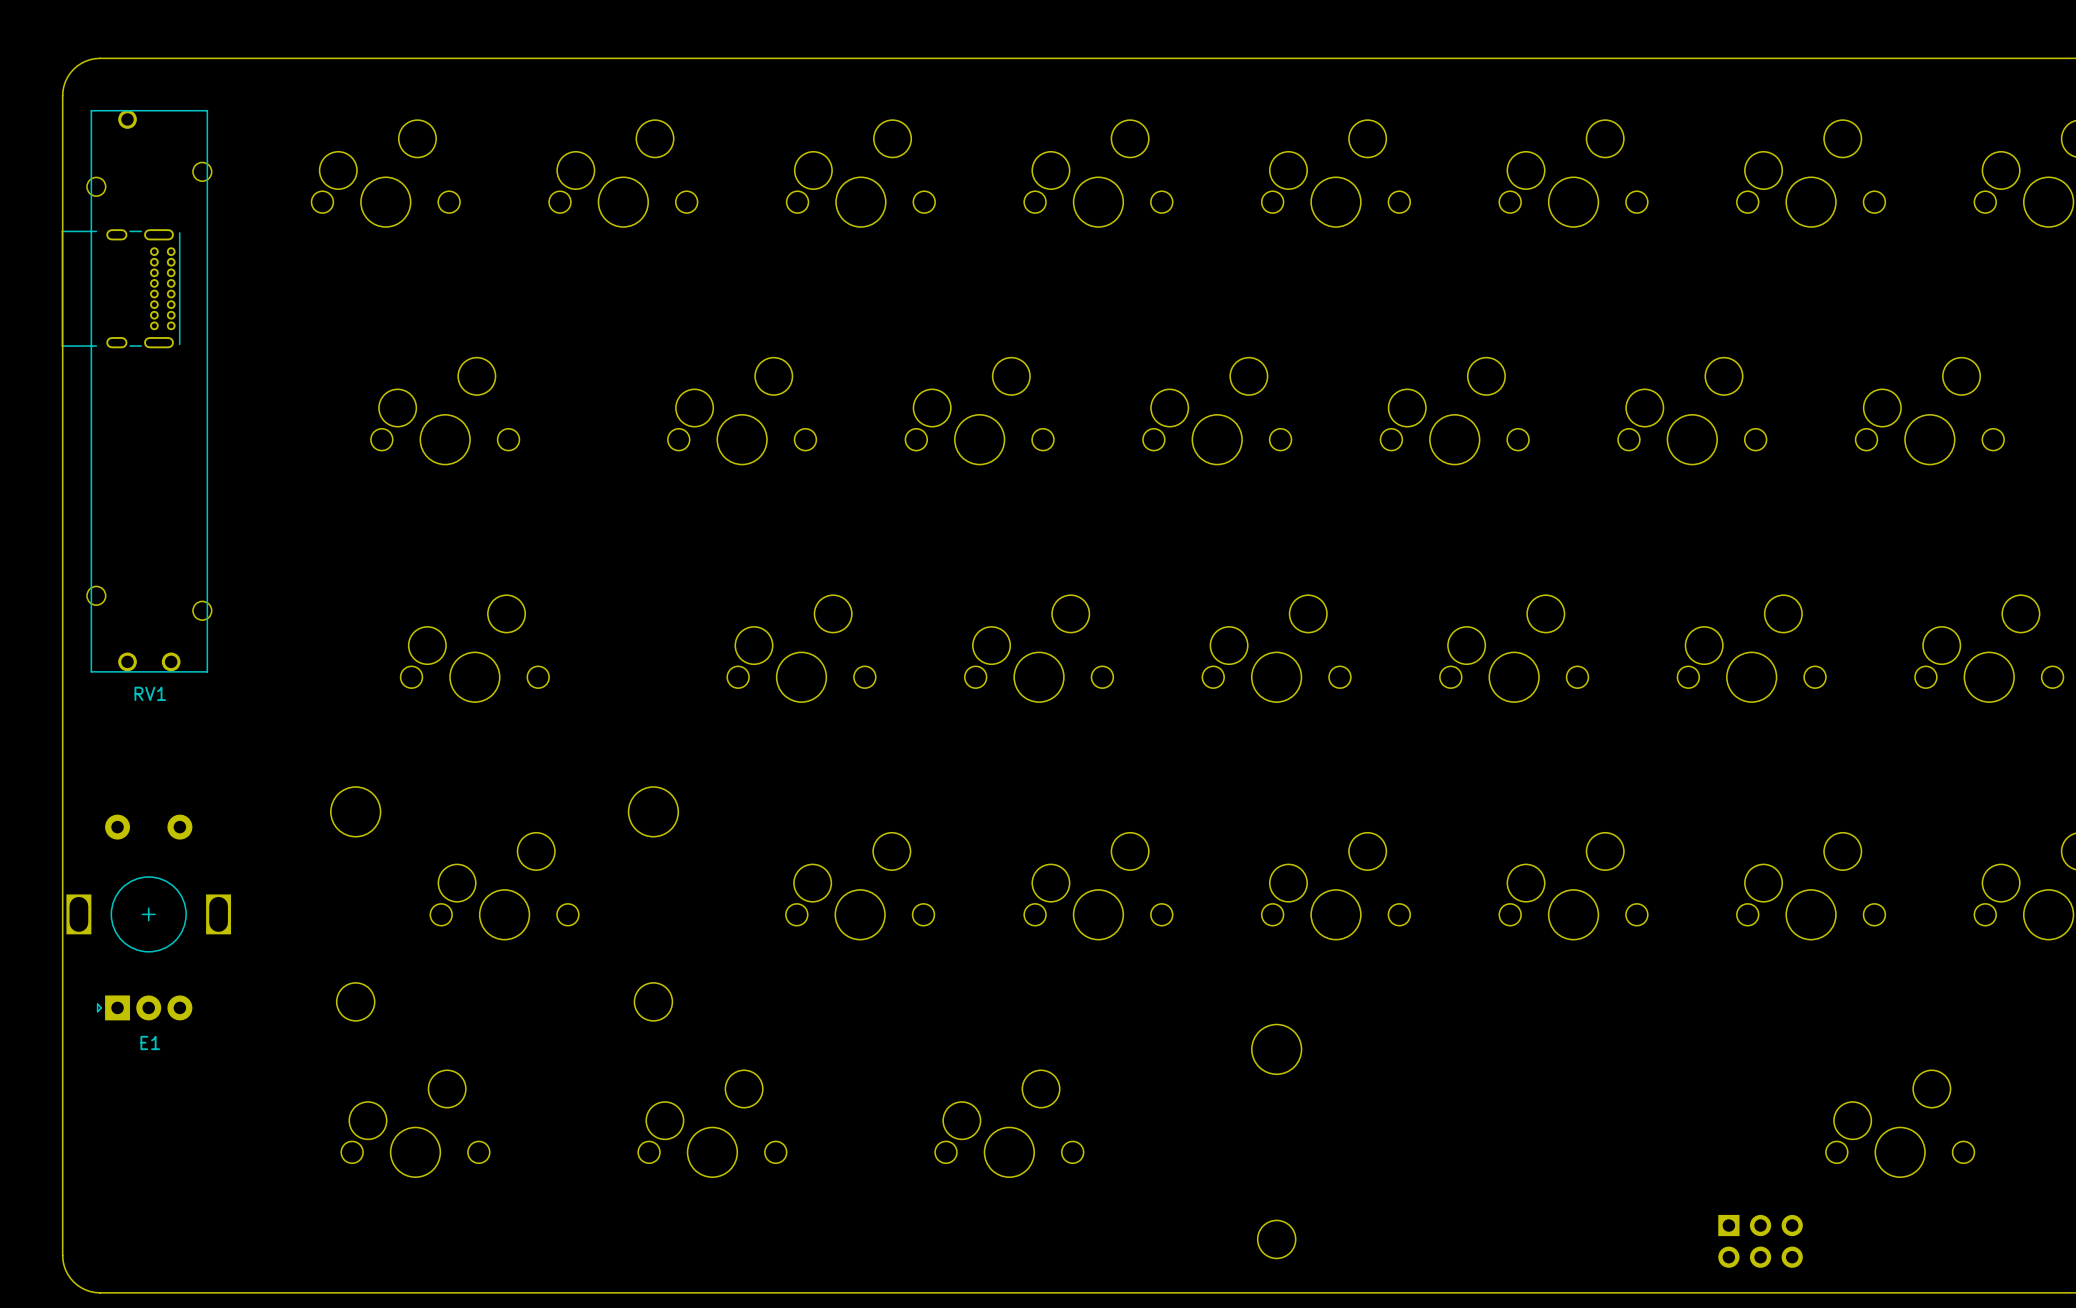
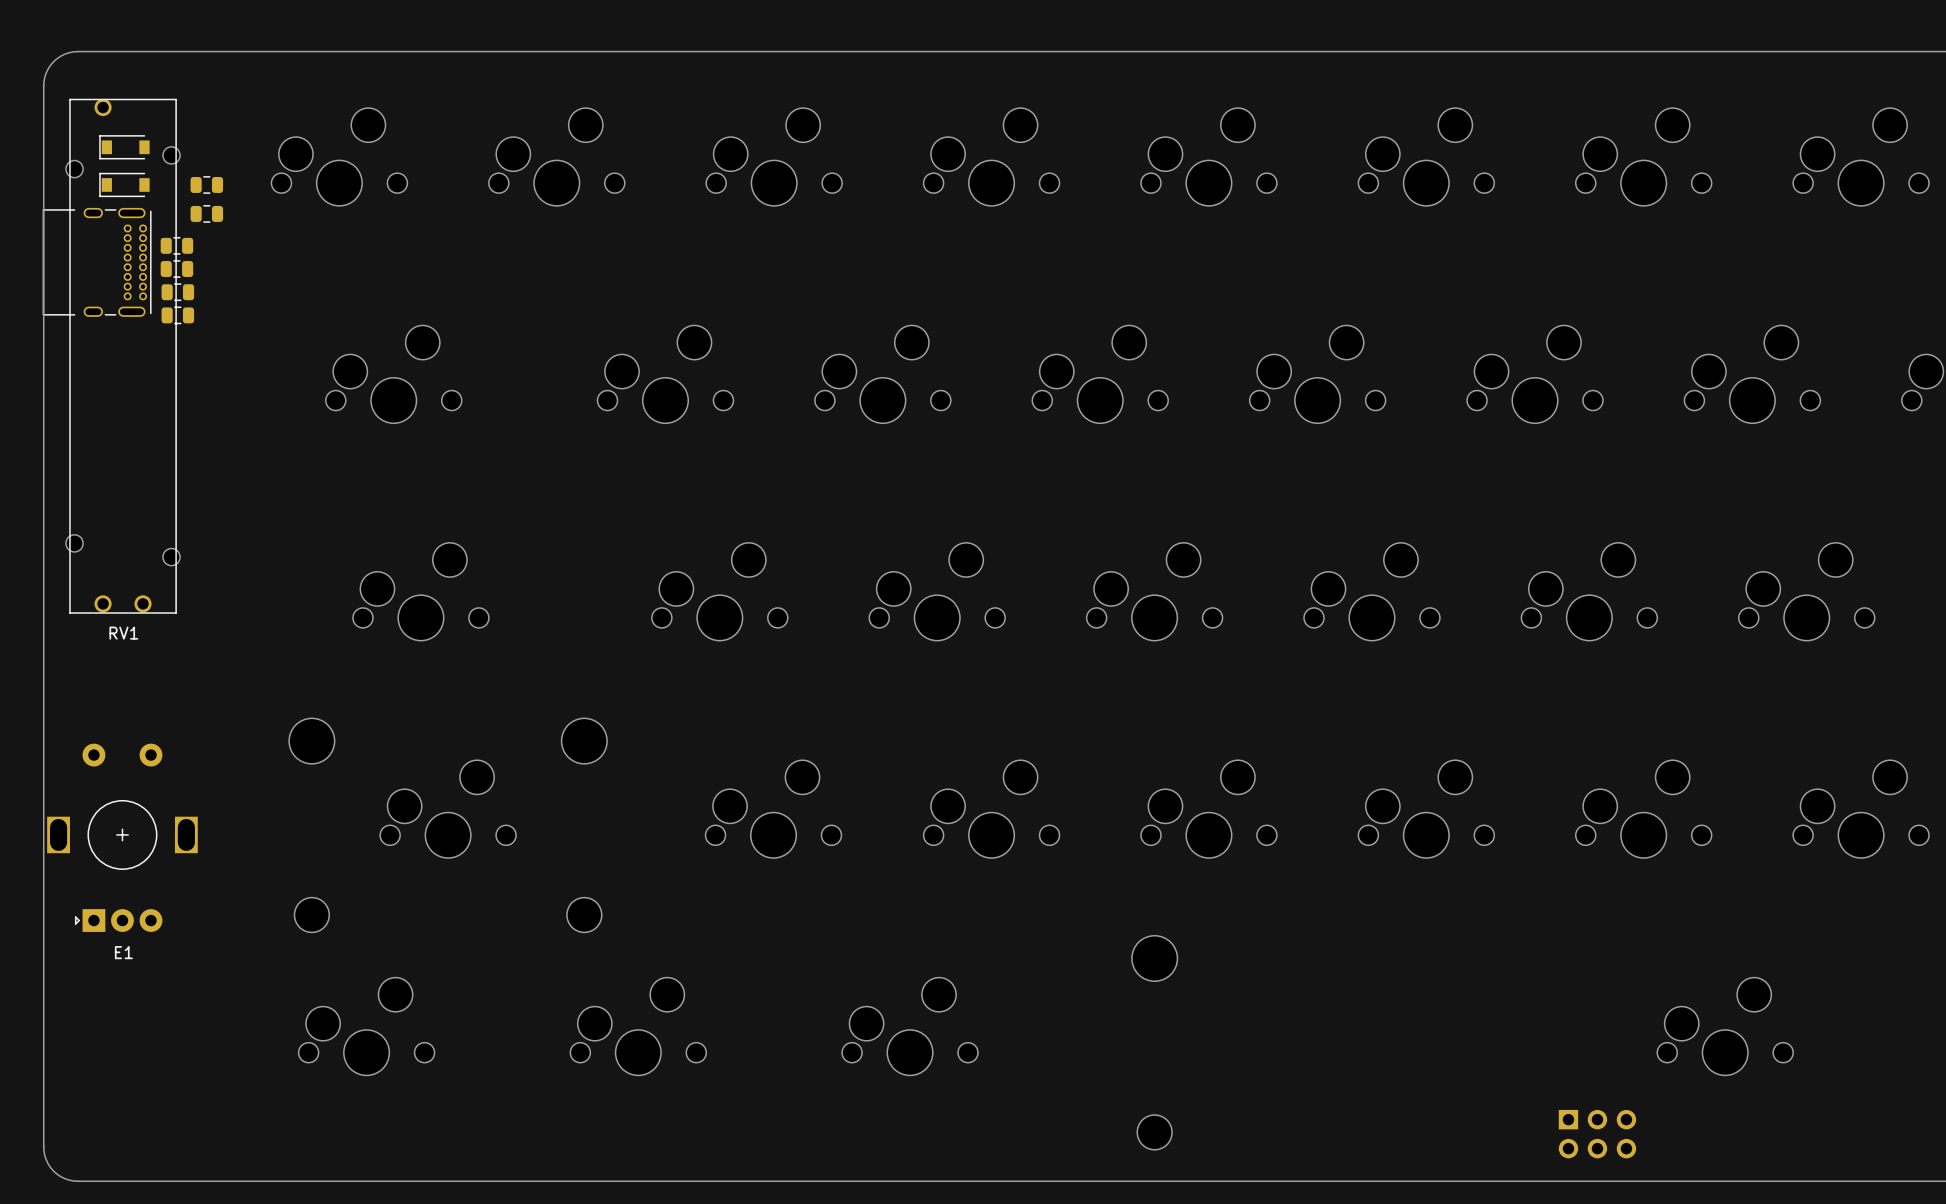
part: none -> (124, 147)
part: none -> (124, 184)
part: none -> (206, 184)
part: none -> (206, 213)
part: none -> (176, 245)
part: none -> (176, 269)
part: none -> (177, 292)
part: none -> (177, 315)

